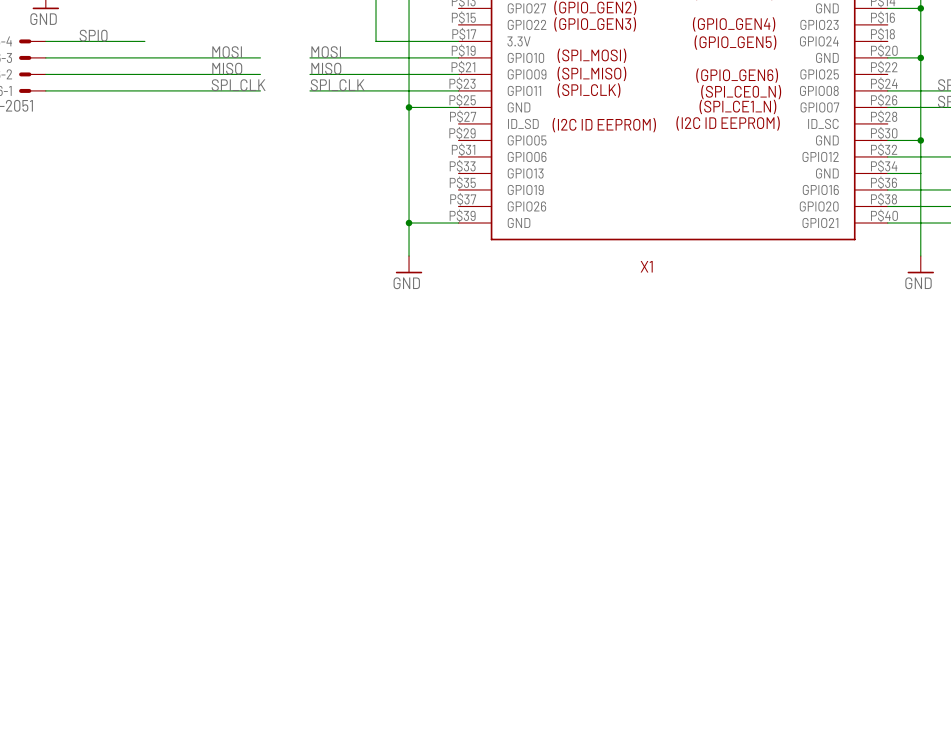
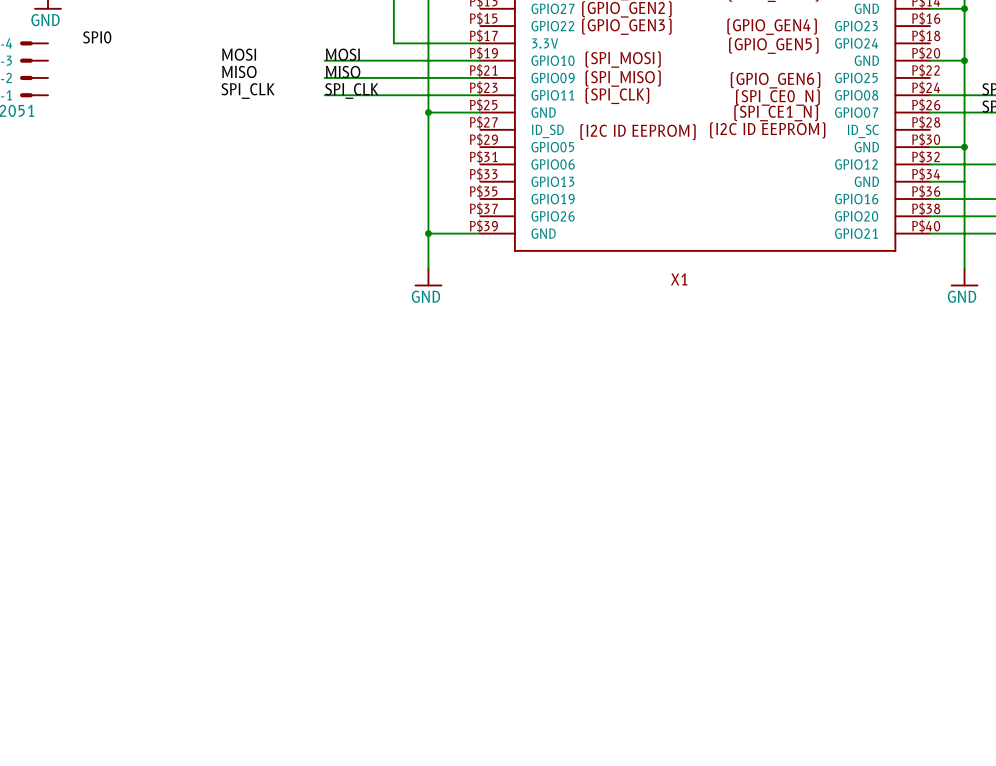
wire: (45, 41) (144, 41) -> none
wire: (45, 57) (260, 57) -> none
wire: (45, 74) (260, 74) -> none
wire: (45, 90) (260, 90) -> none

